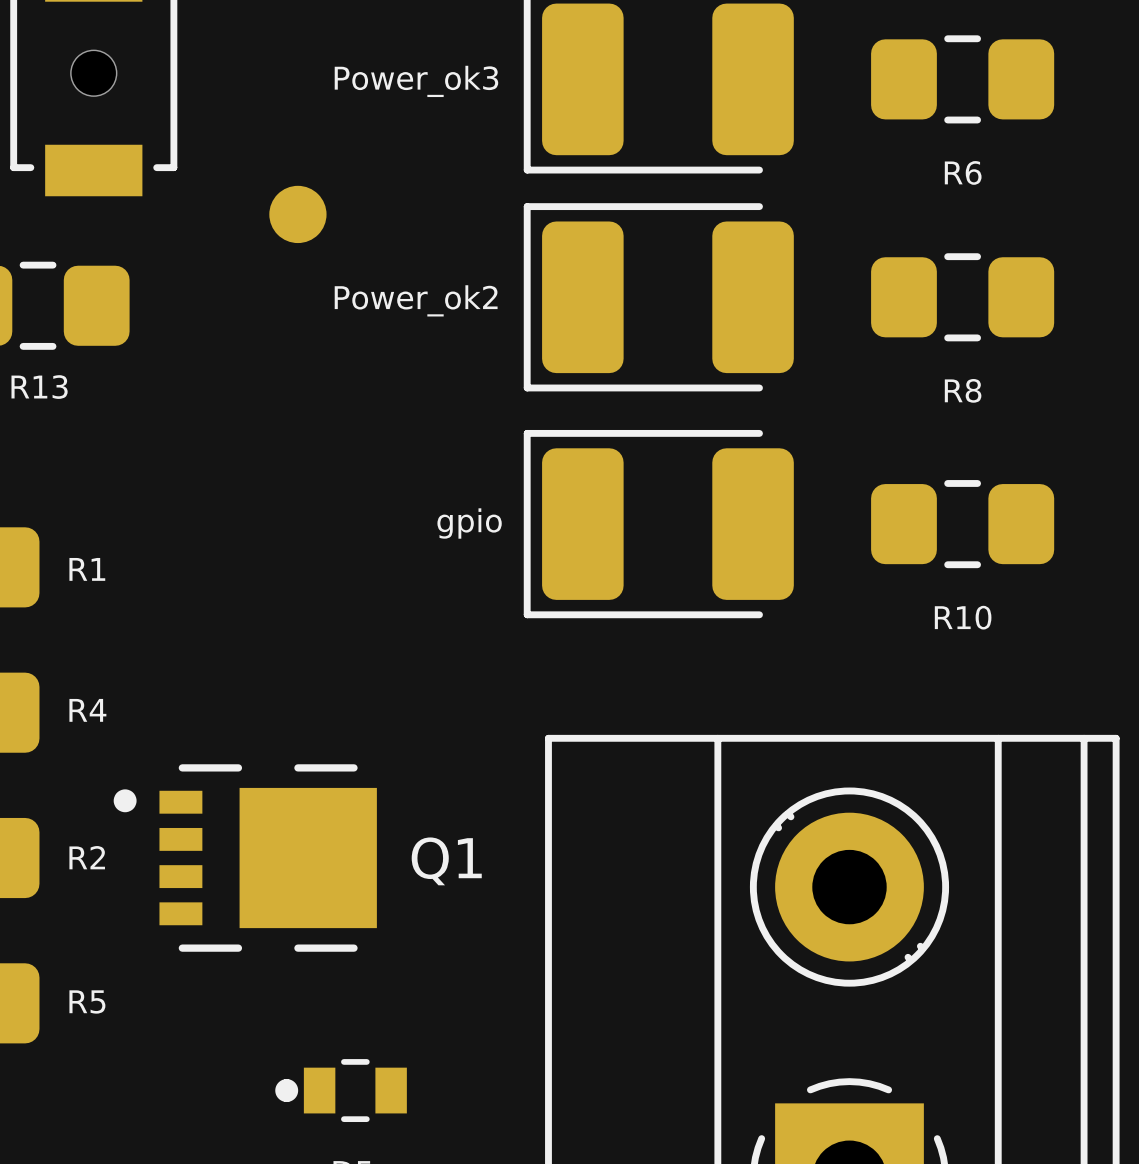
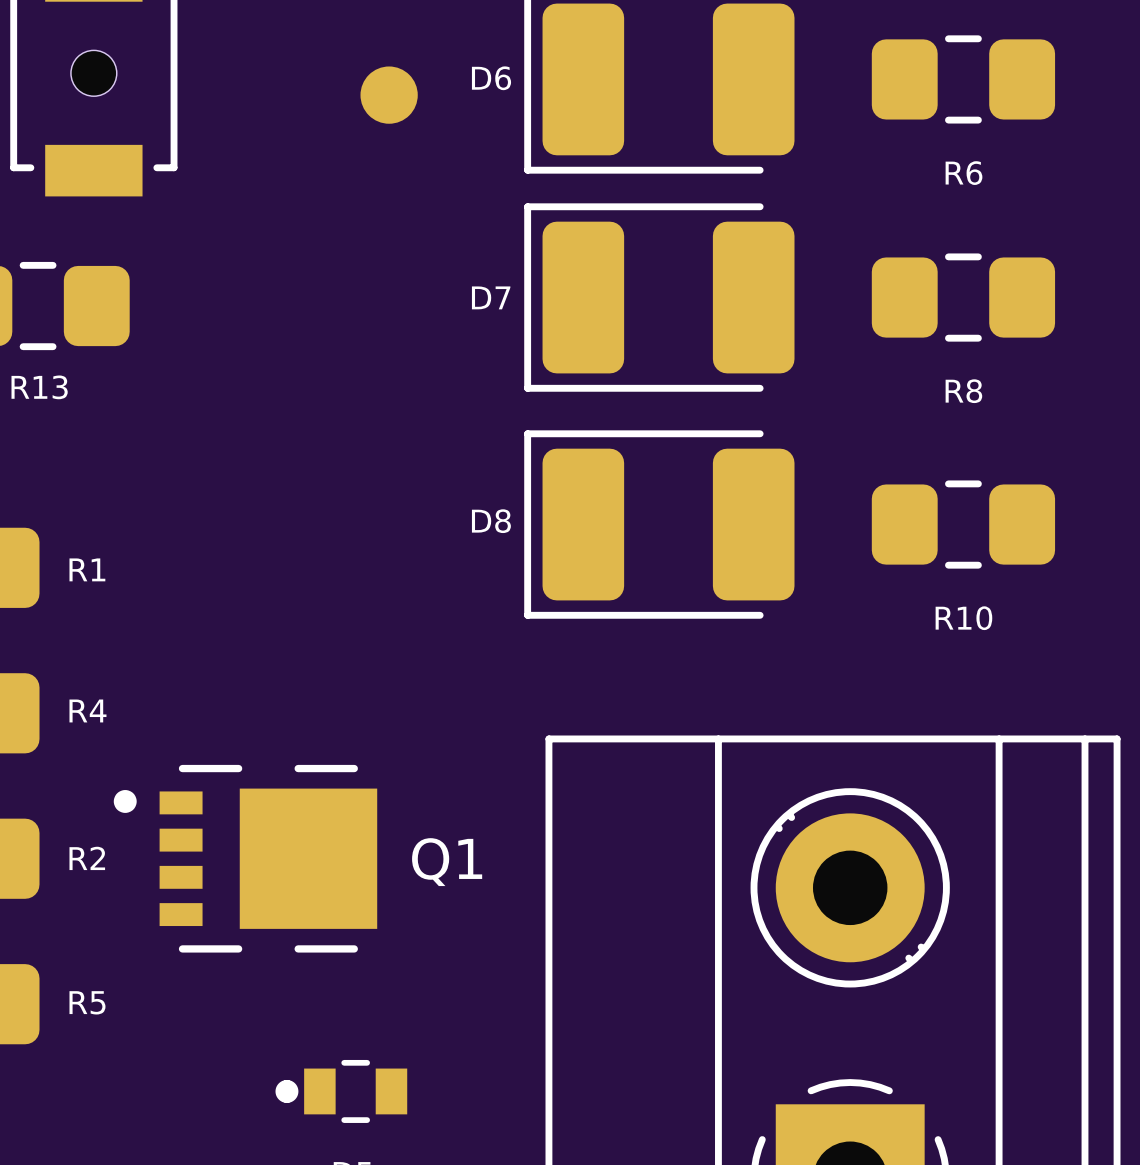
Power_ok3 name: Power_ok3 (416, 81) -> D6 (491, 78)
part position: (297, 214) -> (389, 95)
Power_ok2 name: Power_ok2 (416, 300) -> D7 (491, 297)
gpio name: gpio (469, 523) -> D8 (491, 521)

